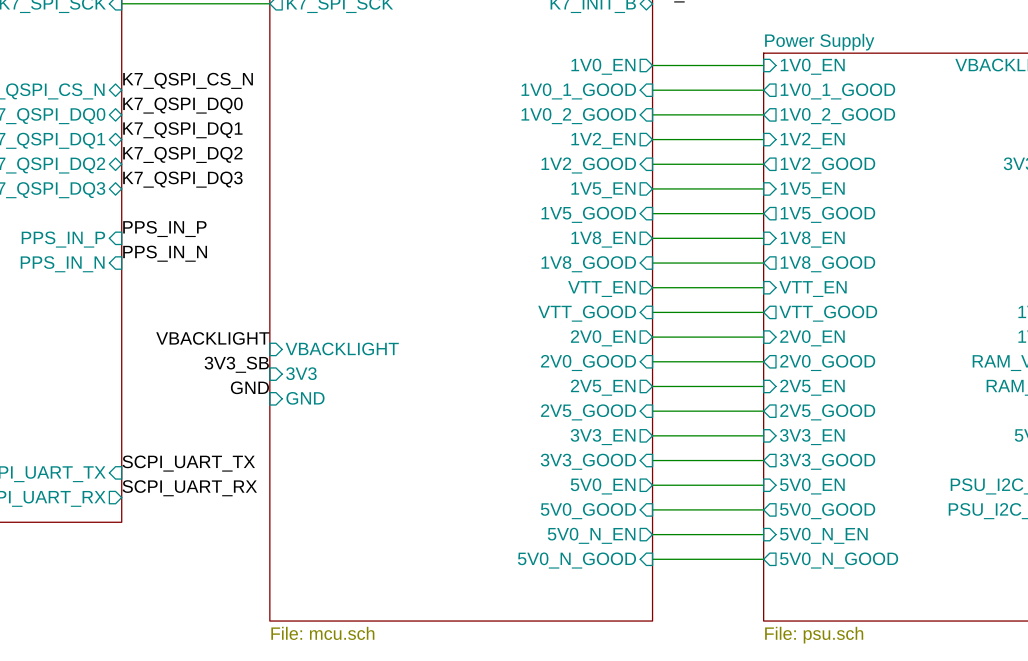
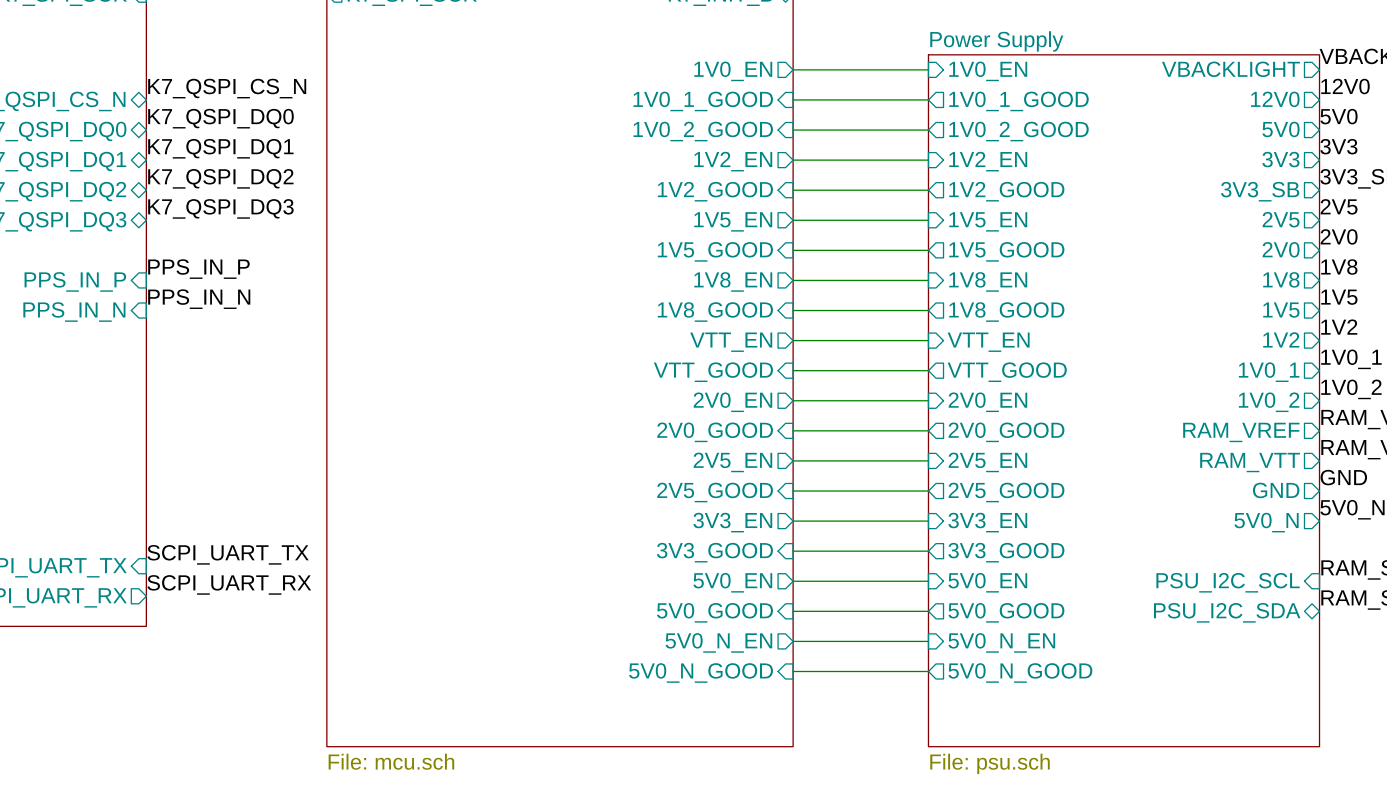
label: VBACKLIGHT (212, 338) -> none
sheet pin: VBACKLIGHT (342, 348) -> none
label: 3V3_SB (236, 364) -> none
sheet pin: 3V3 (301, 373) -> none
label: GND (249, 387) -> none
sheet pin: GND (305, 398) -> none

